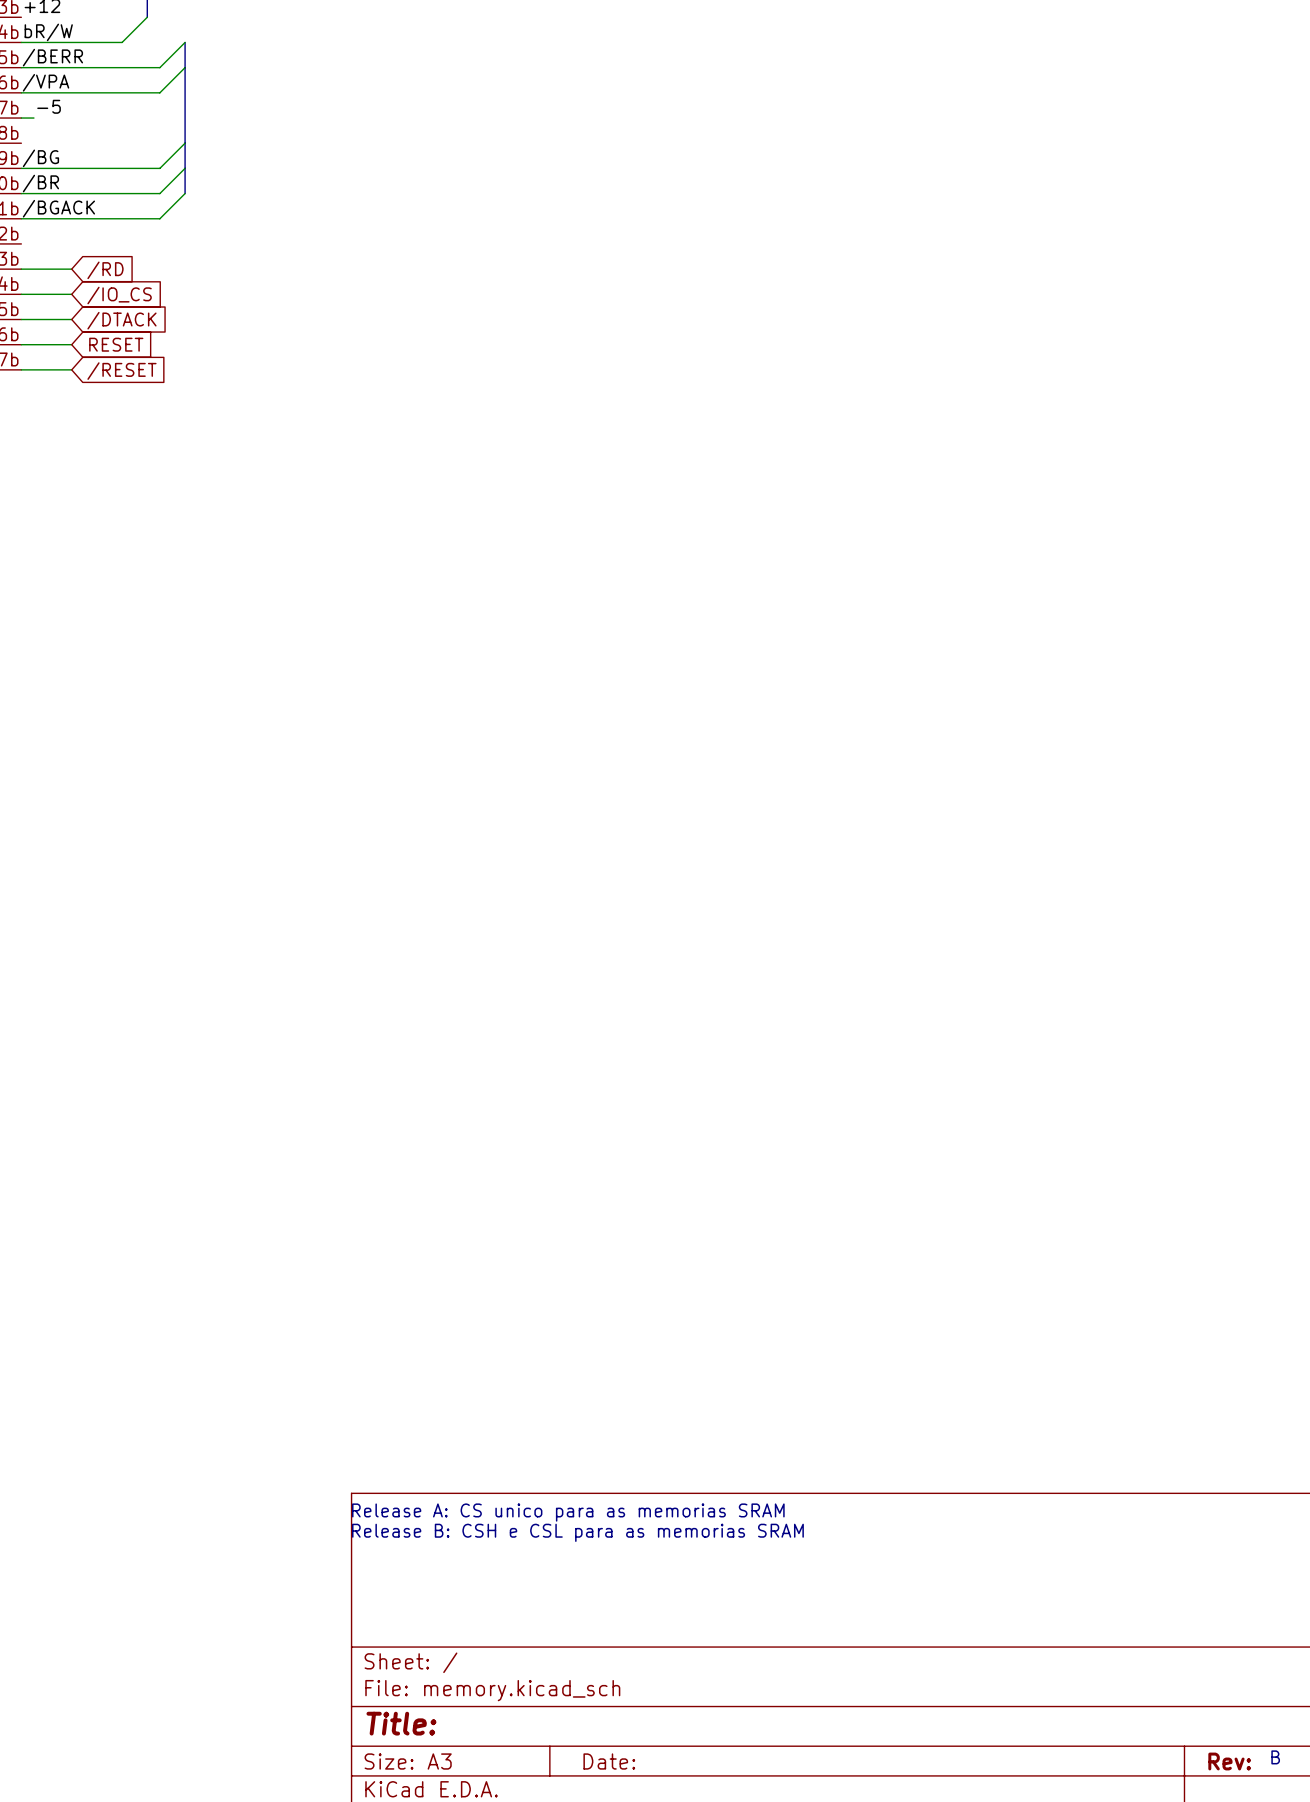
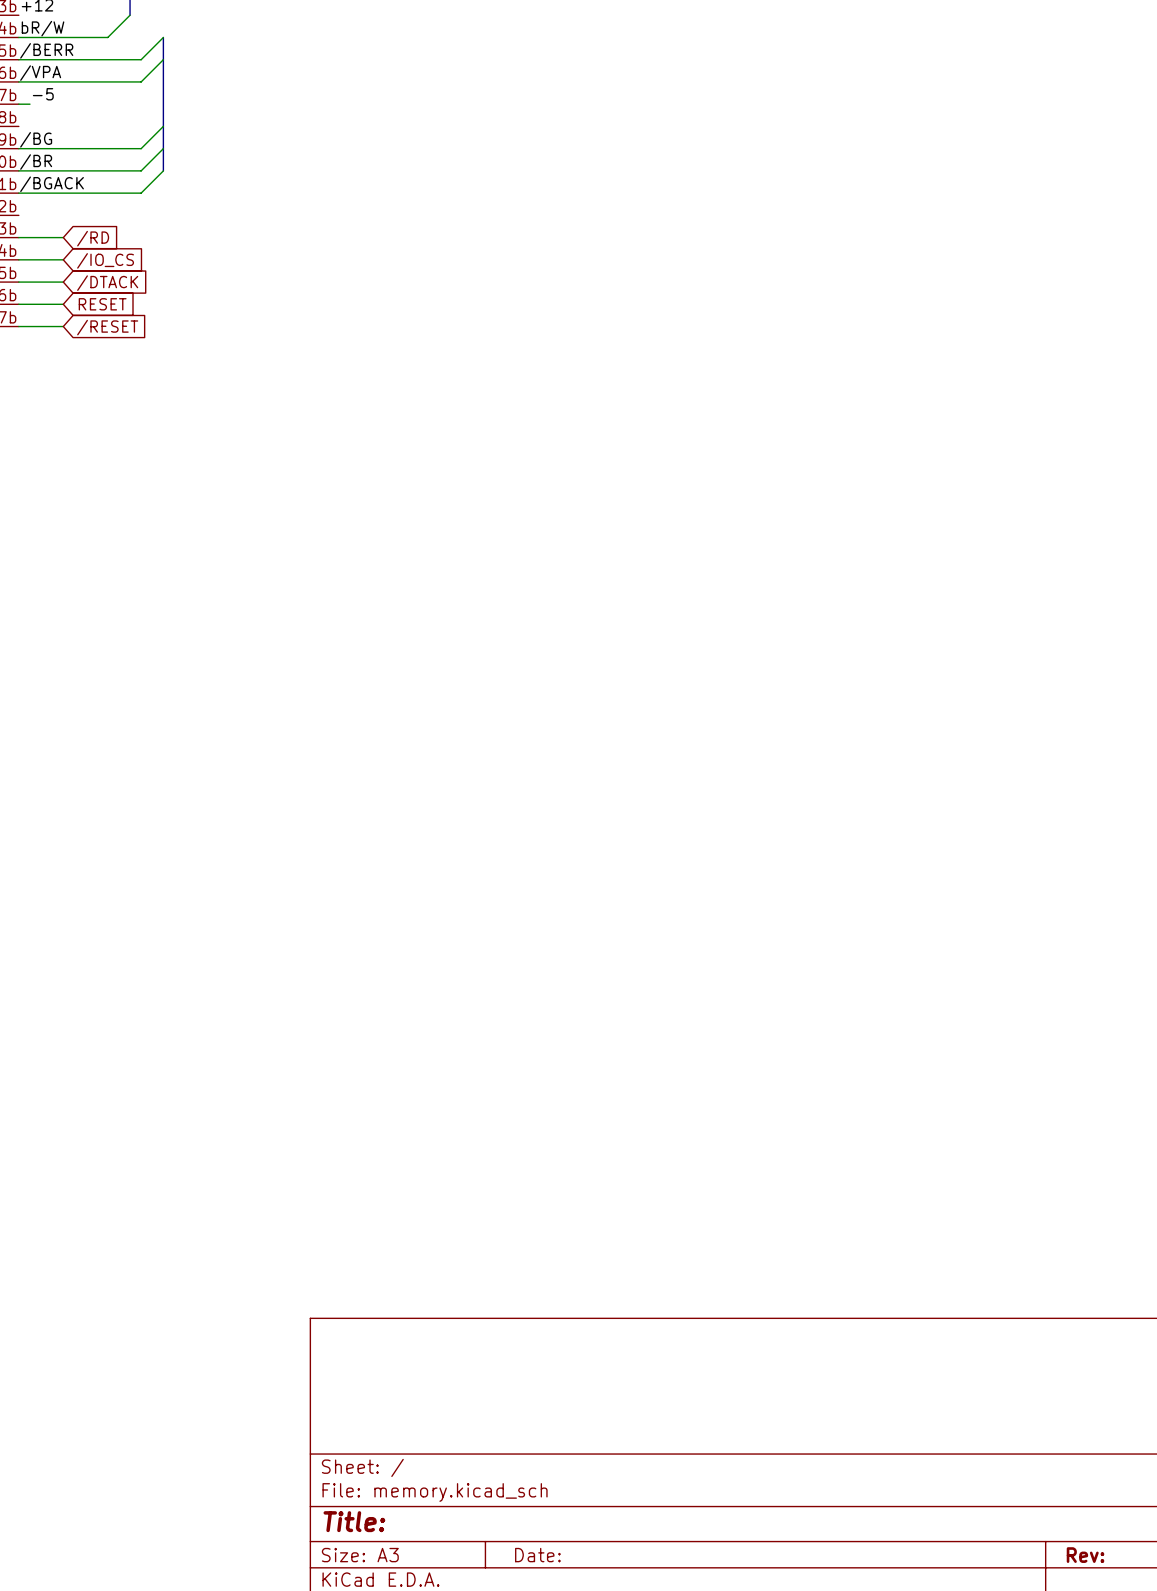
text: Release A: CS unico para as memorias SRAM (568, 1512) -> none
text: Release B: CSH e CSL para as memorias SRAM (577, 1532) -> none
text: B (1275, 1757) -> none

